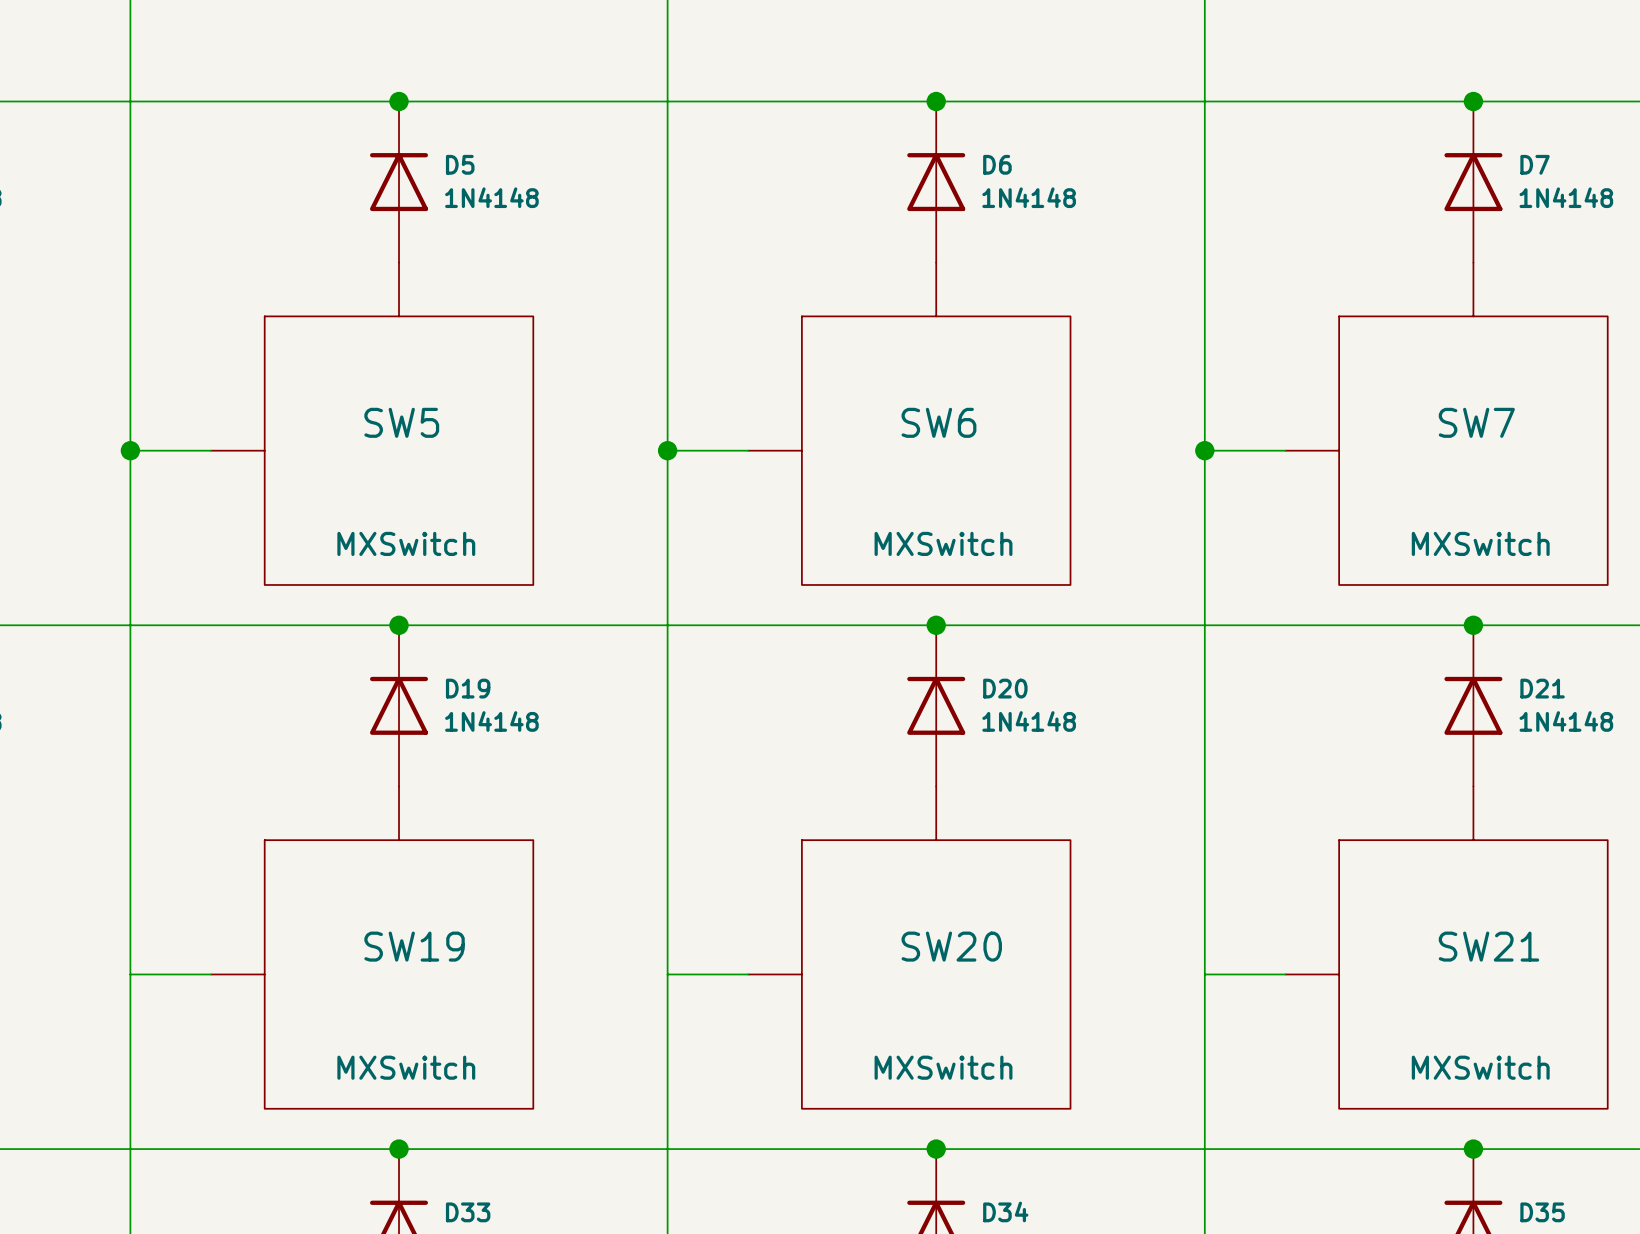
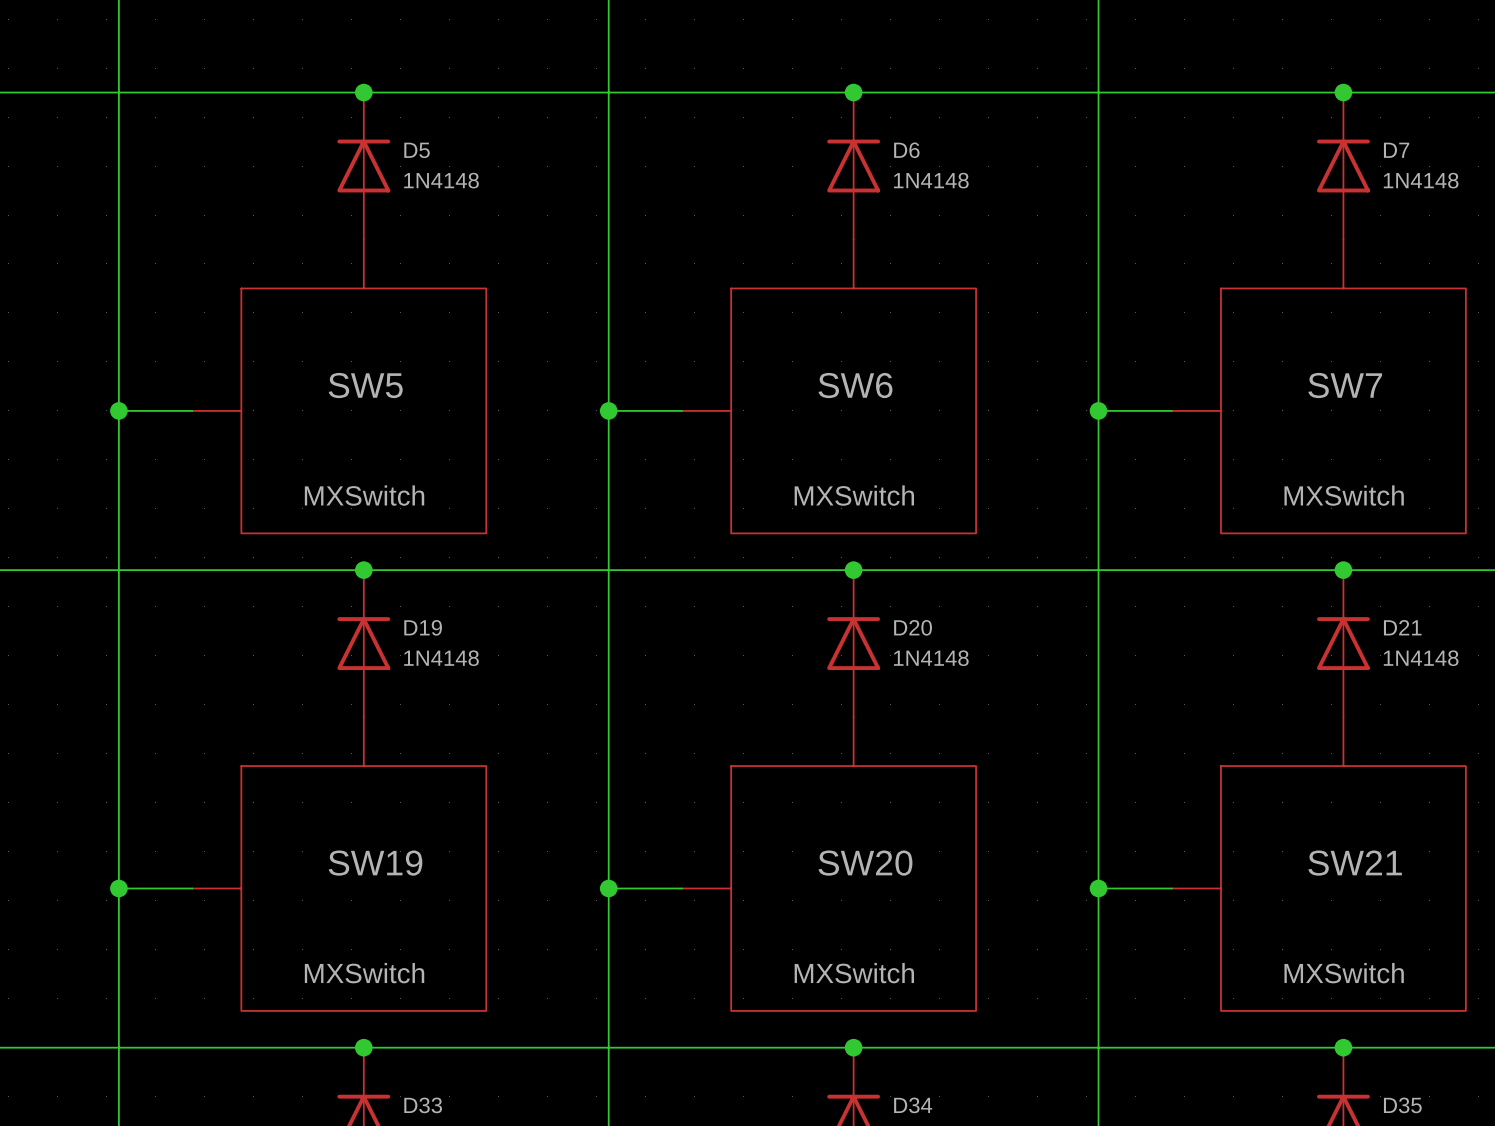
junction: none -> (118, 888)
junction: none -> (608, 888)
junction: none -> (1098, 888)

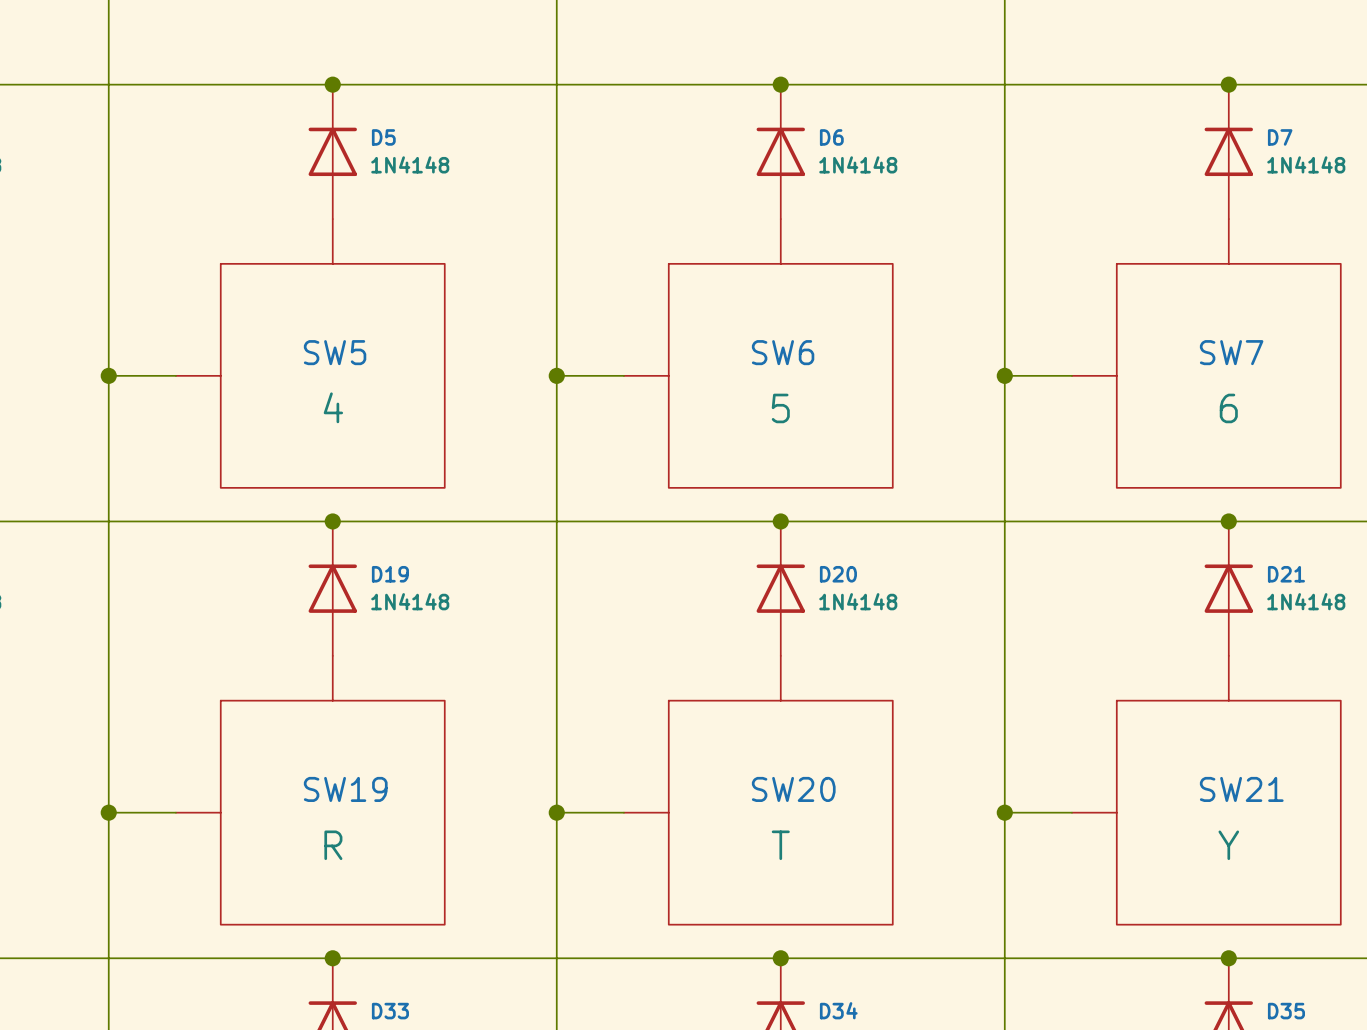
SW5 value: MXSwitch (364, 495) -> 4 (333, 407)
SW6 value: MXSwitch (854, 495) -> 5 (780, 408)
SW7 value: MXSwitch (1344, 495) -> 6 (1228, 408)
SW19 value: MXSwitch (364, 973) -> R (333, 845)
SW20 value: MXSwitch (854, 973) -> T (780, 845)
SW21 value: MXSwitch (1344, 973) -> Y (1228, 845)

